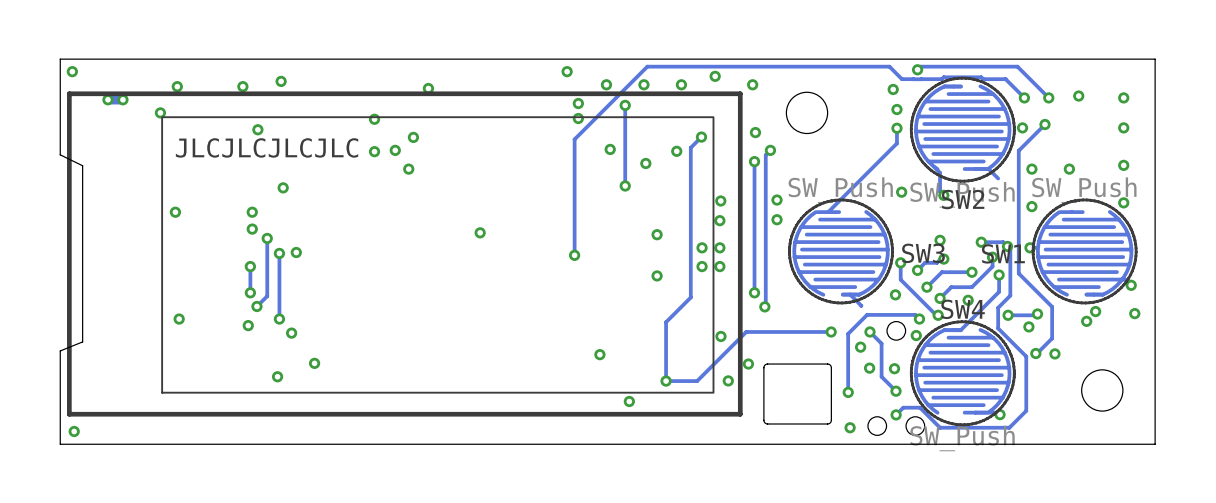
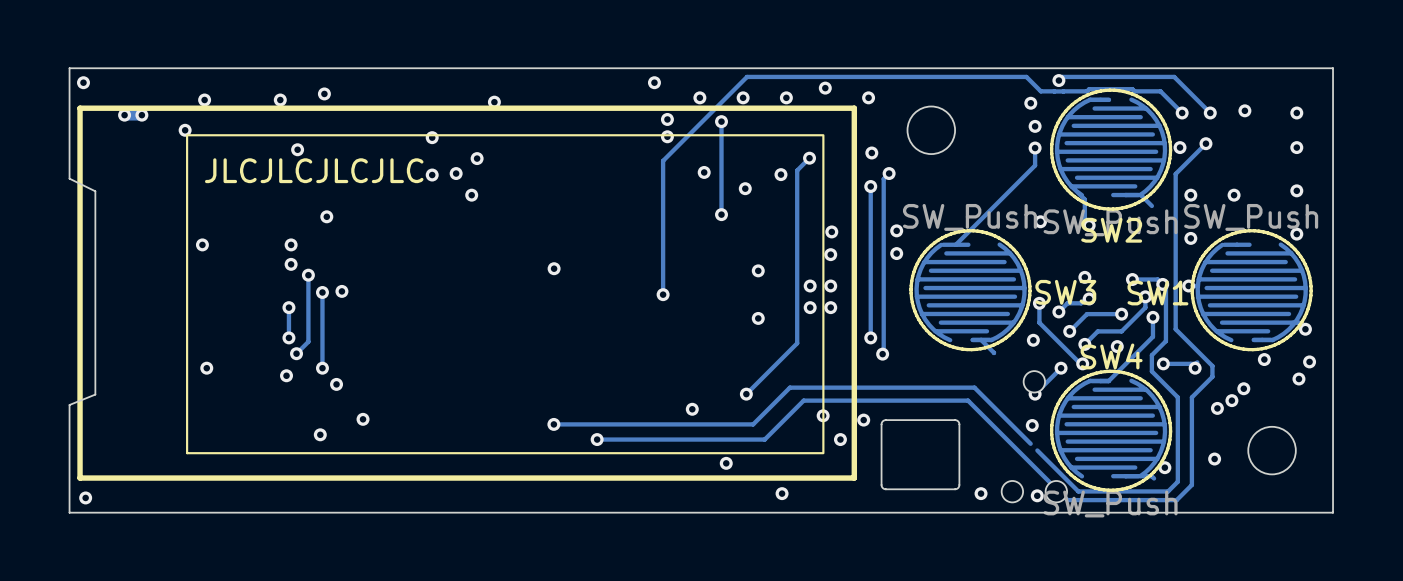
track: (1018, 273) (1052, 306) (1052, 338) (1035, 353) -> (1175, 315) (1175, 329) (1212, 366) (1212, 376) (1191, 397) (1191, 484) (1176, 500) (1067, 500) (968, 400) (803, 400) (764, 439) (597, 439)
via: (1037, 313) -> none
track: (919, 319) (915, 314) (867, 314) (848, 333) (848, 392) -> (1061, 368) (1035, 394)
via: none -> (1195, 368)
track: (998, 321) (998, 328) (1026, 356) (1026, 410) (1009, 427) (940, 427) (920, 407) (903, 407) (896, 414) -> (1151, 371) (1177, 397) (1177, 481) (1168, 491) (1078, 491) (1037, 450)
via: (1086, 321) -> none
track: (666, 322) (666, 381) (697, 381) (746, 331) (831, 331) -> (768, 371) (746, 394)
via: (1028, 326) -> none
via: none -> (1298, 379)
via: (831, 331) -> none
track: (869, 331) (881, 343) (881, 376) (896, 391) -> none
via: (869, 331) -> none
via: (916, 335) -> none
via position: (720, 336) -> (823, 415)
via: none -> (1243, 388)
via: none -> (746, 394)
via: none -> (1035, 394)
via: (860, 347) -> none
via: none -> (1231, 400)
via: (1035, 353) -> none
track: none -> (553, 424) (753, 424) (789, 387) (974, 387) (1030, 443)
via: none -> (553, 424)
via: (869, 368) -> none
via: none -> (597, 439)
via: (666, 381) -> none
via: (896, 391) -> none
via: (848, 392) -> none
via: none -> (1214, 459)
via position: (896, 414) -> (1037, 495)
via position: (1000, 414) -> (1164, 467)
via: none -> (782, 493)

